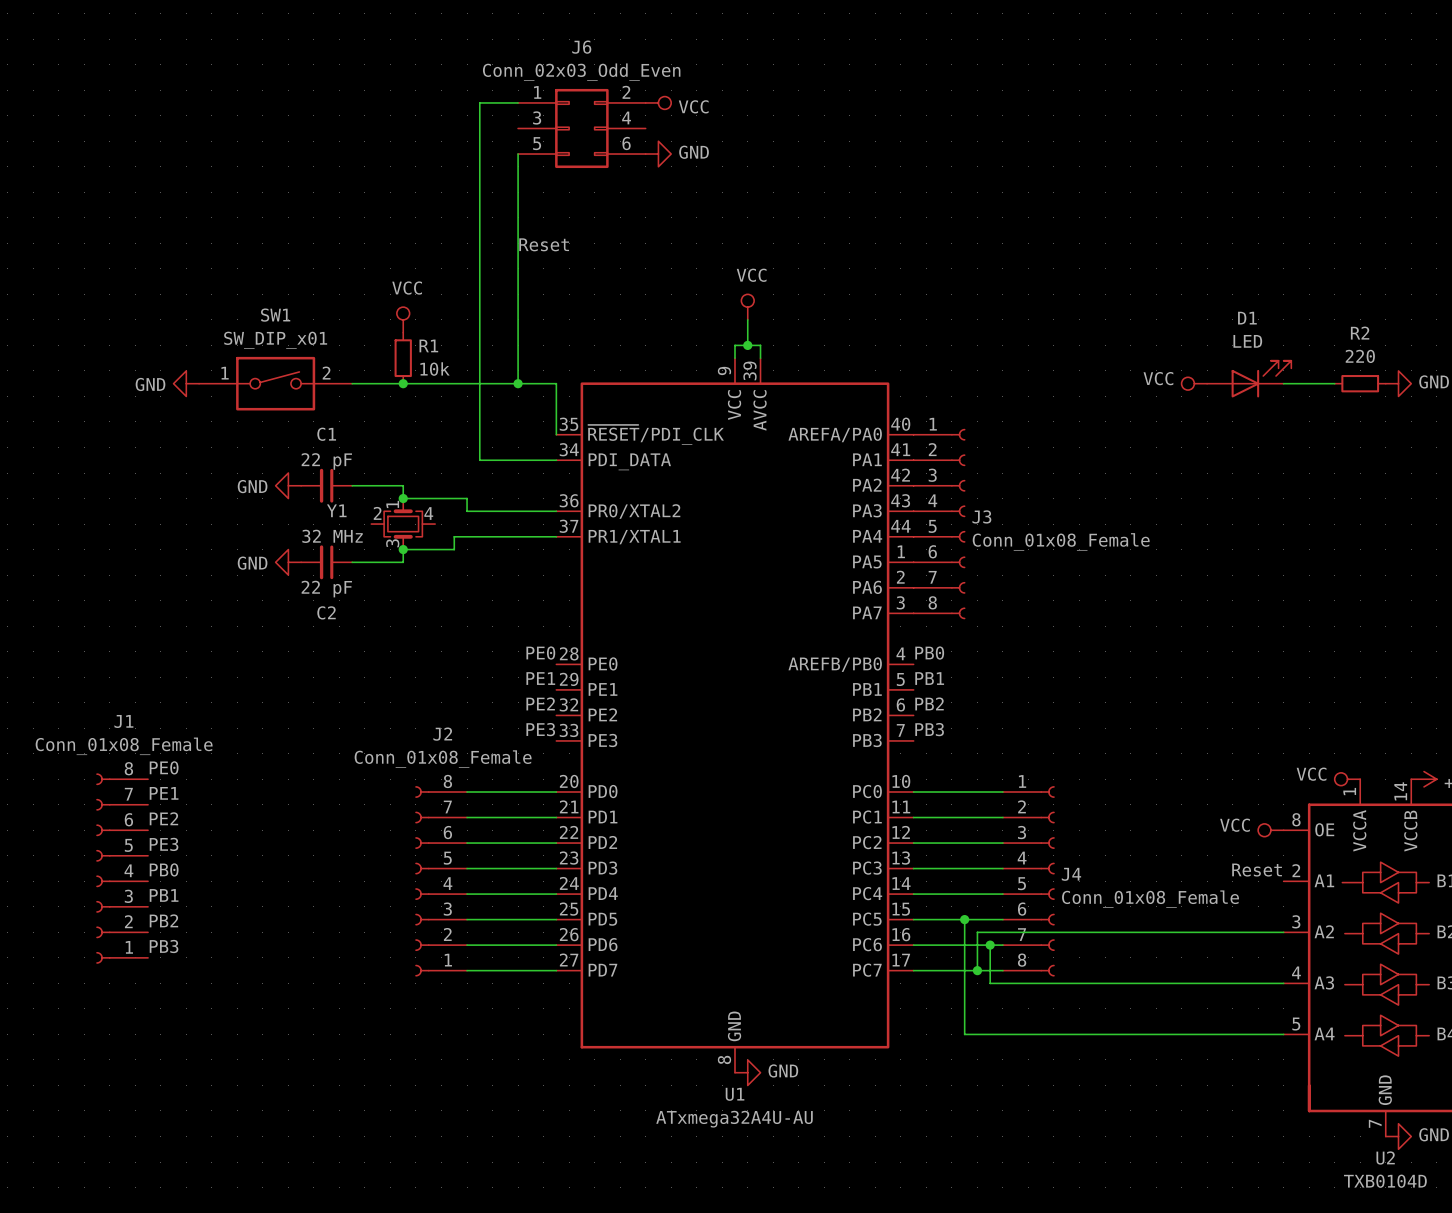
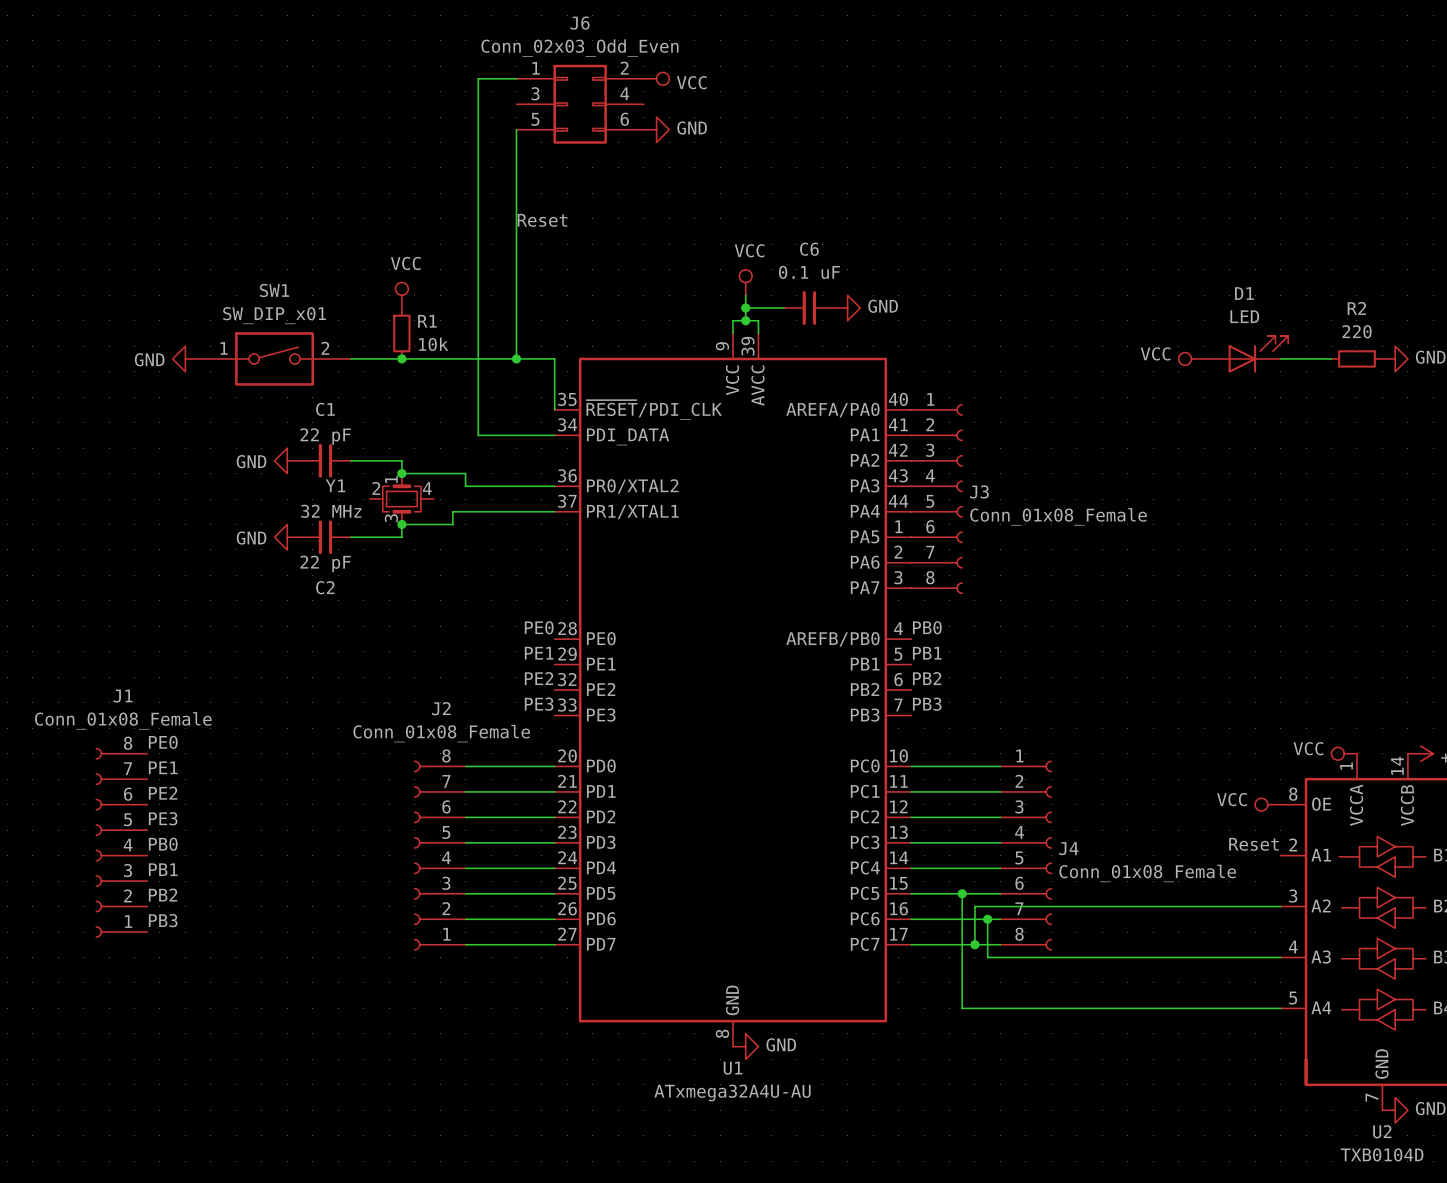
wire: none -> (745, 308) (783, 308)
junction: none -> (745, 308)
C6: none -> 0.1 uF (809, 308)
power symbol: none -> GND (847, 308)

